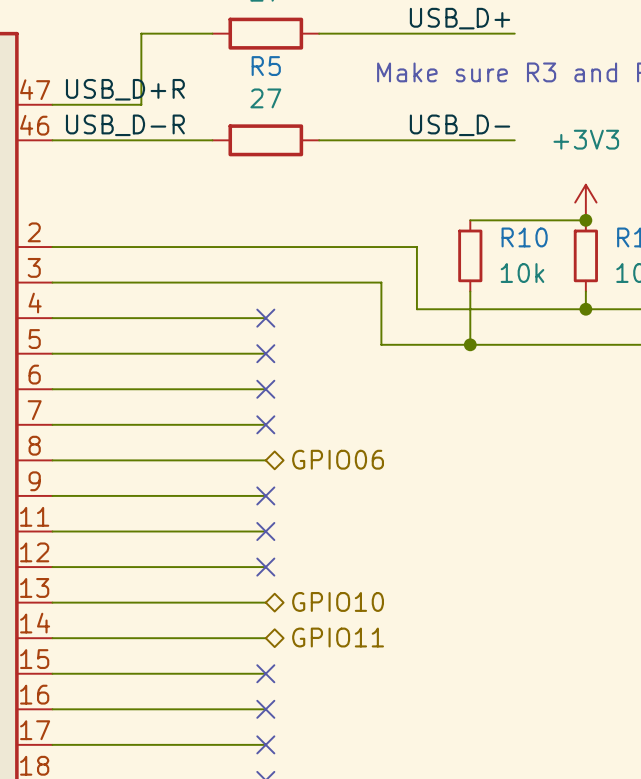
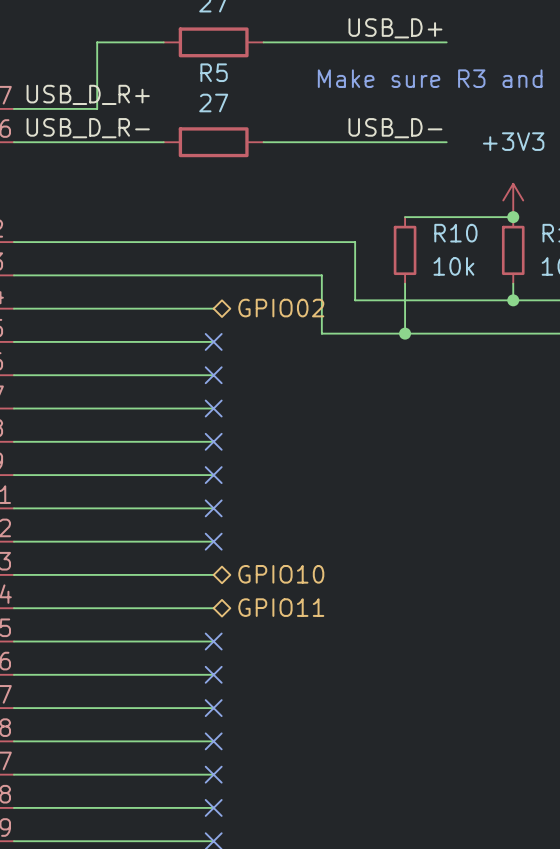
label: USB_D+R (125, 89) -> USB_D_R+ (88, 94)
label: USB_D-R (125, 125) -> USB_D_R- (88, 128)
hierarchical label: none -> GPIO02 (281, 308)
no-connect mark: (265, 318) -> none
hierarchical label: GPIO06 (338, 459) -> none
no-connect mark: none -> (213, 441)

